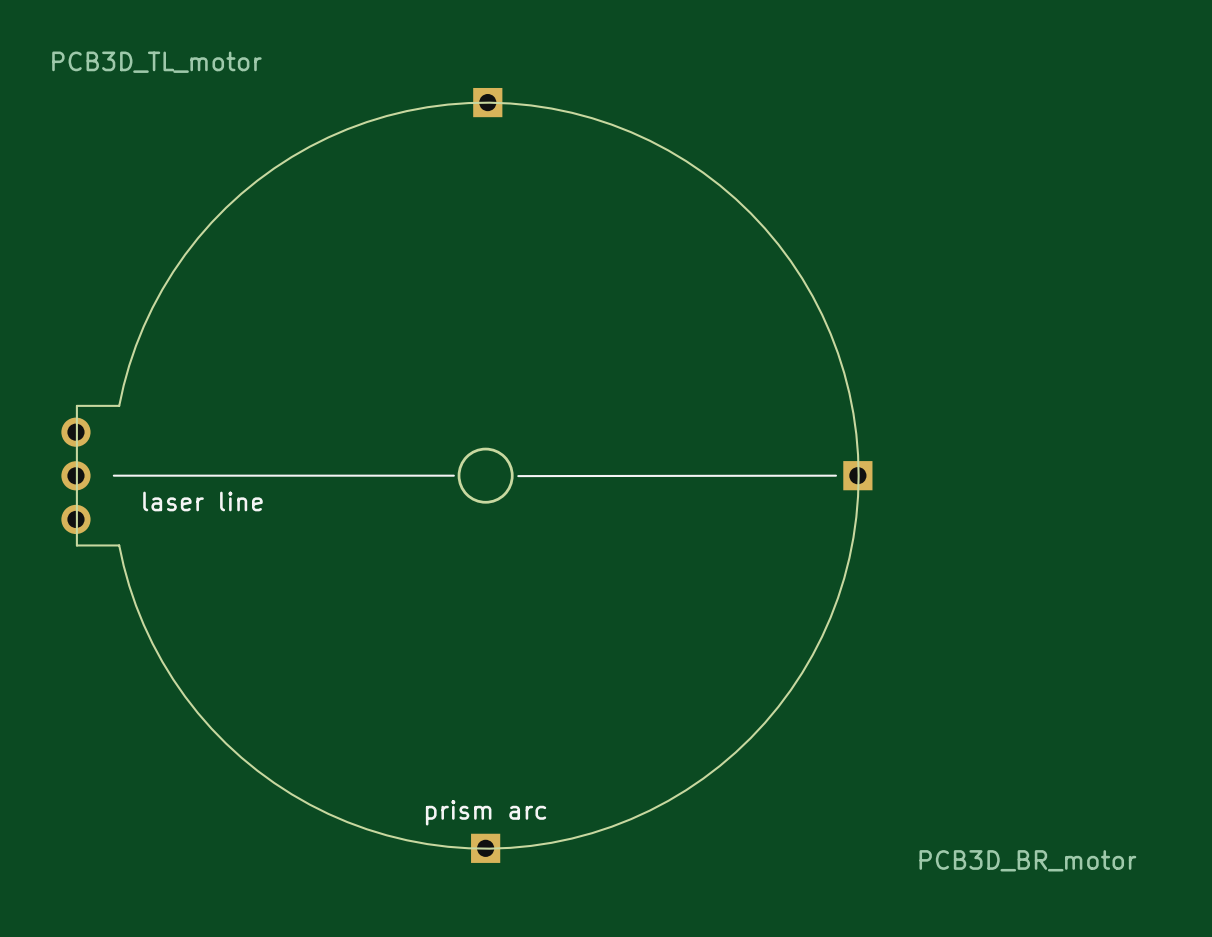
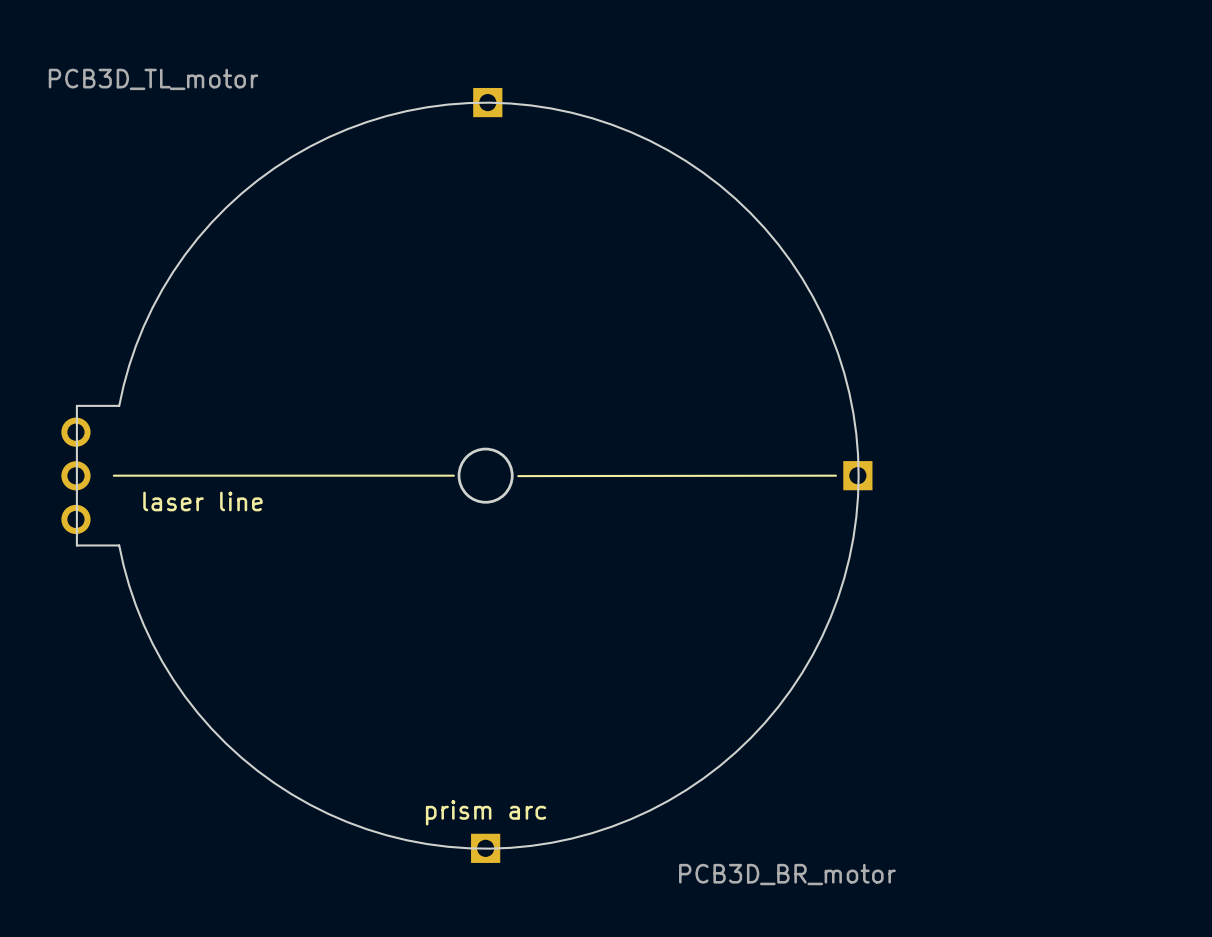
text position: PCB3D_TL_motor (156, 62) -> PCB3D_TL_motor (153, 79)
text position: PCB3D_BR_motor (1027, 860) -> PCB3D_BR_motor (787, 874)

